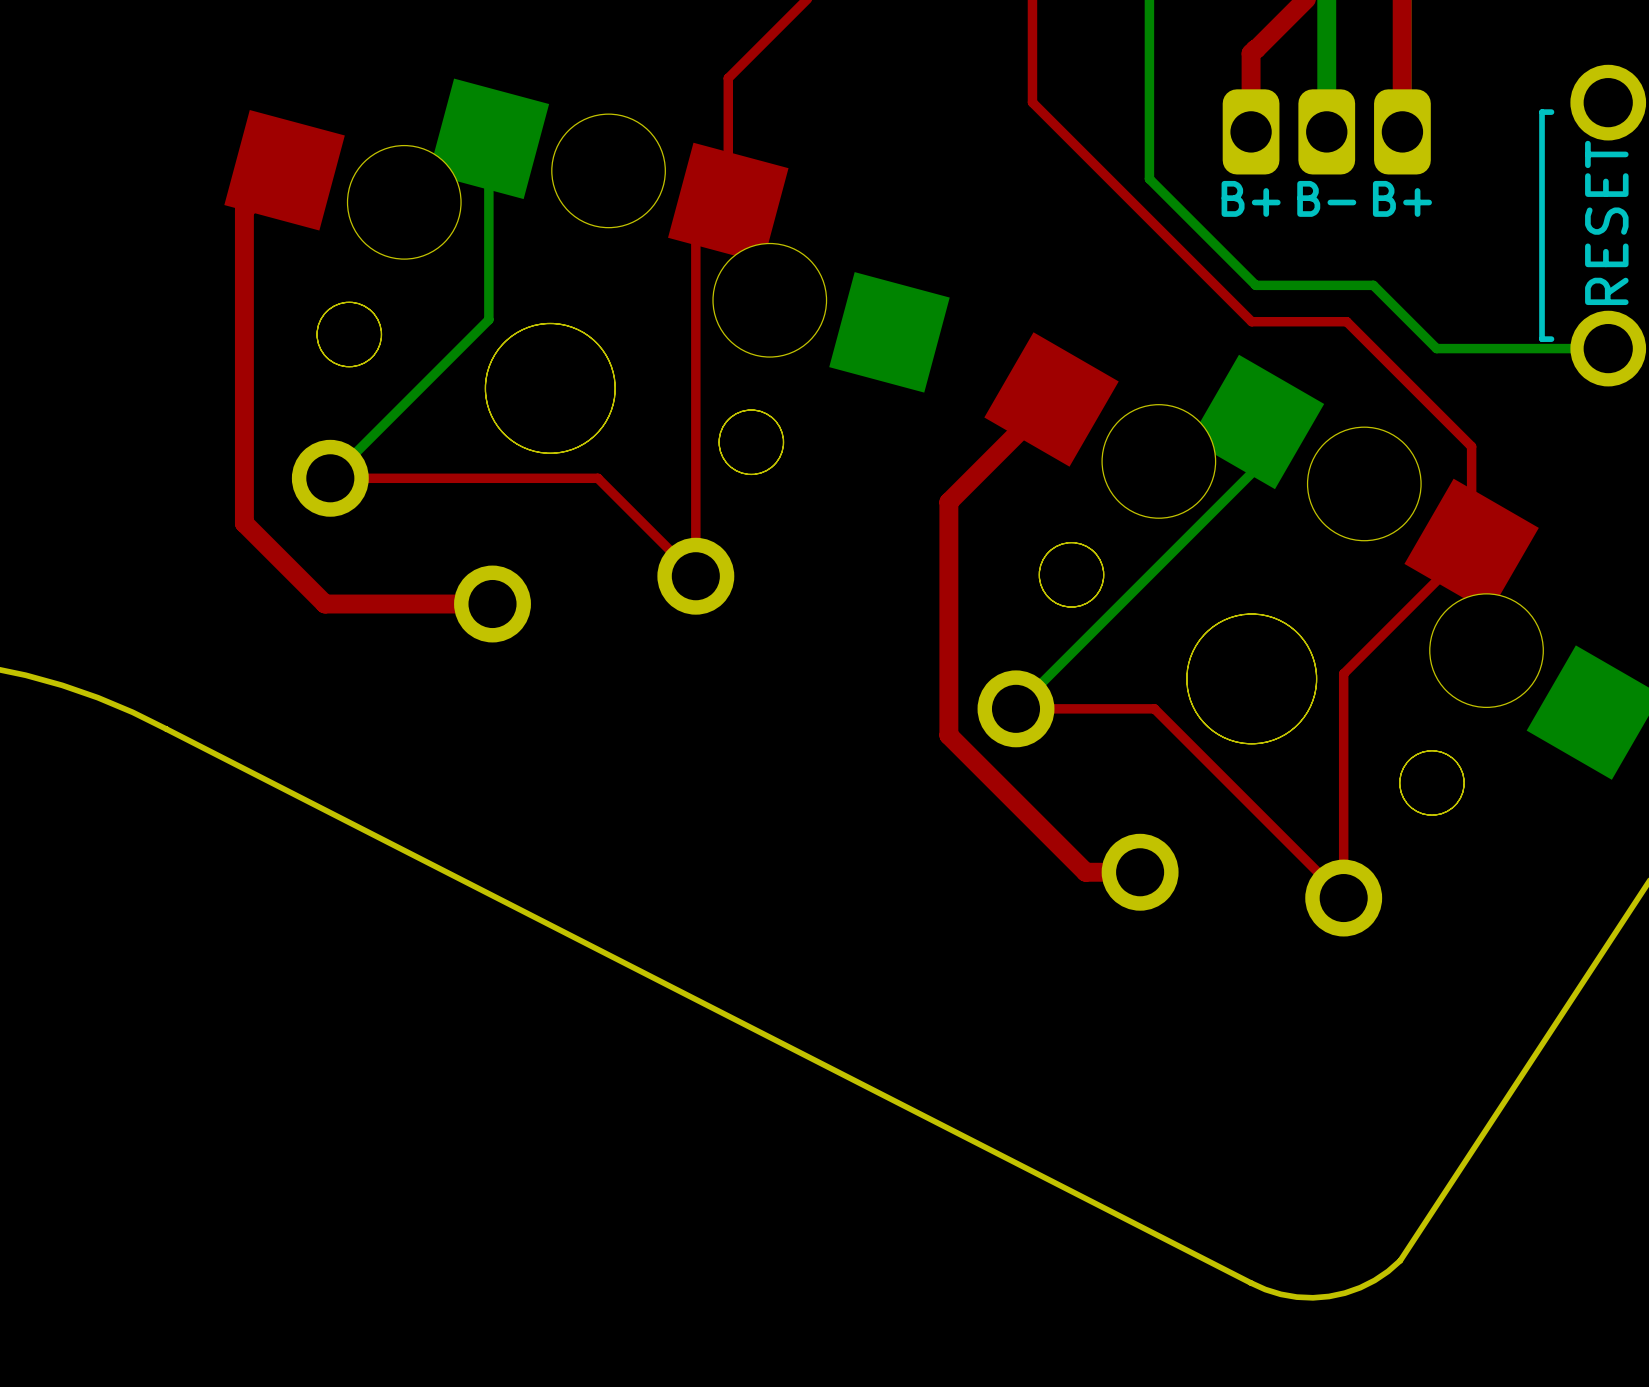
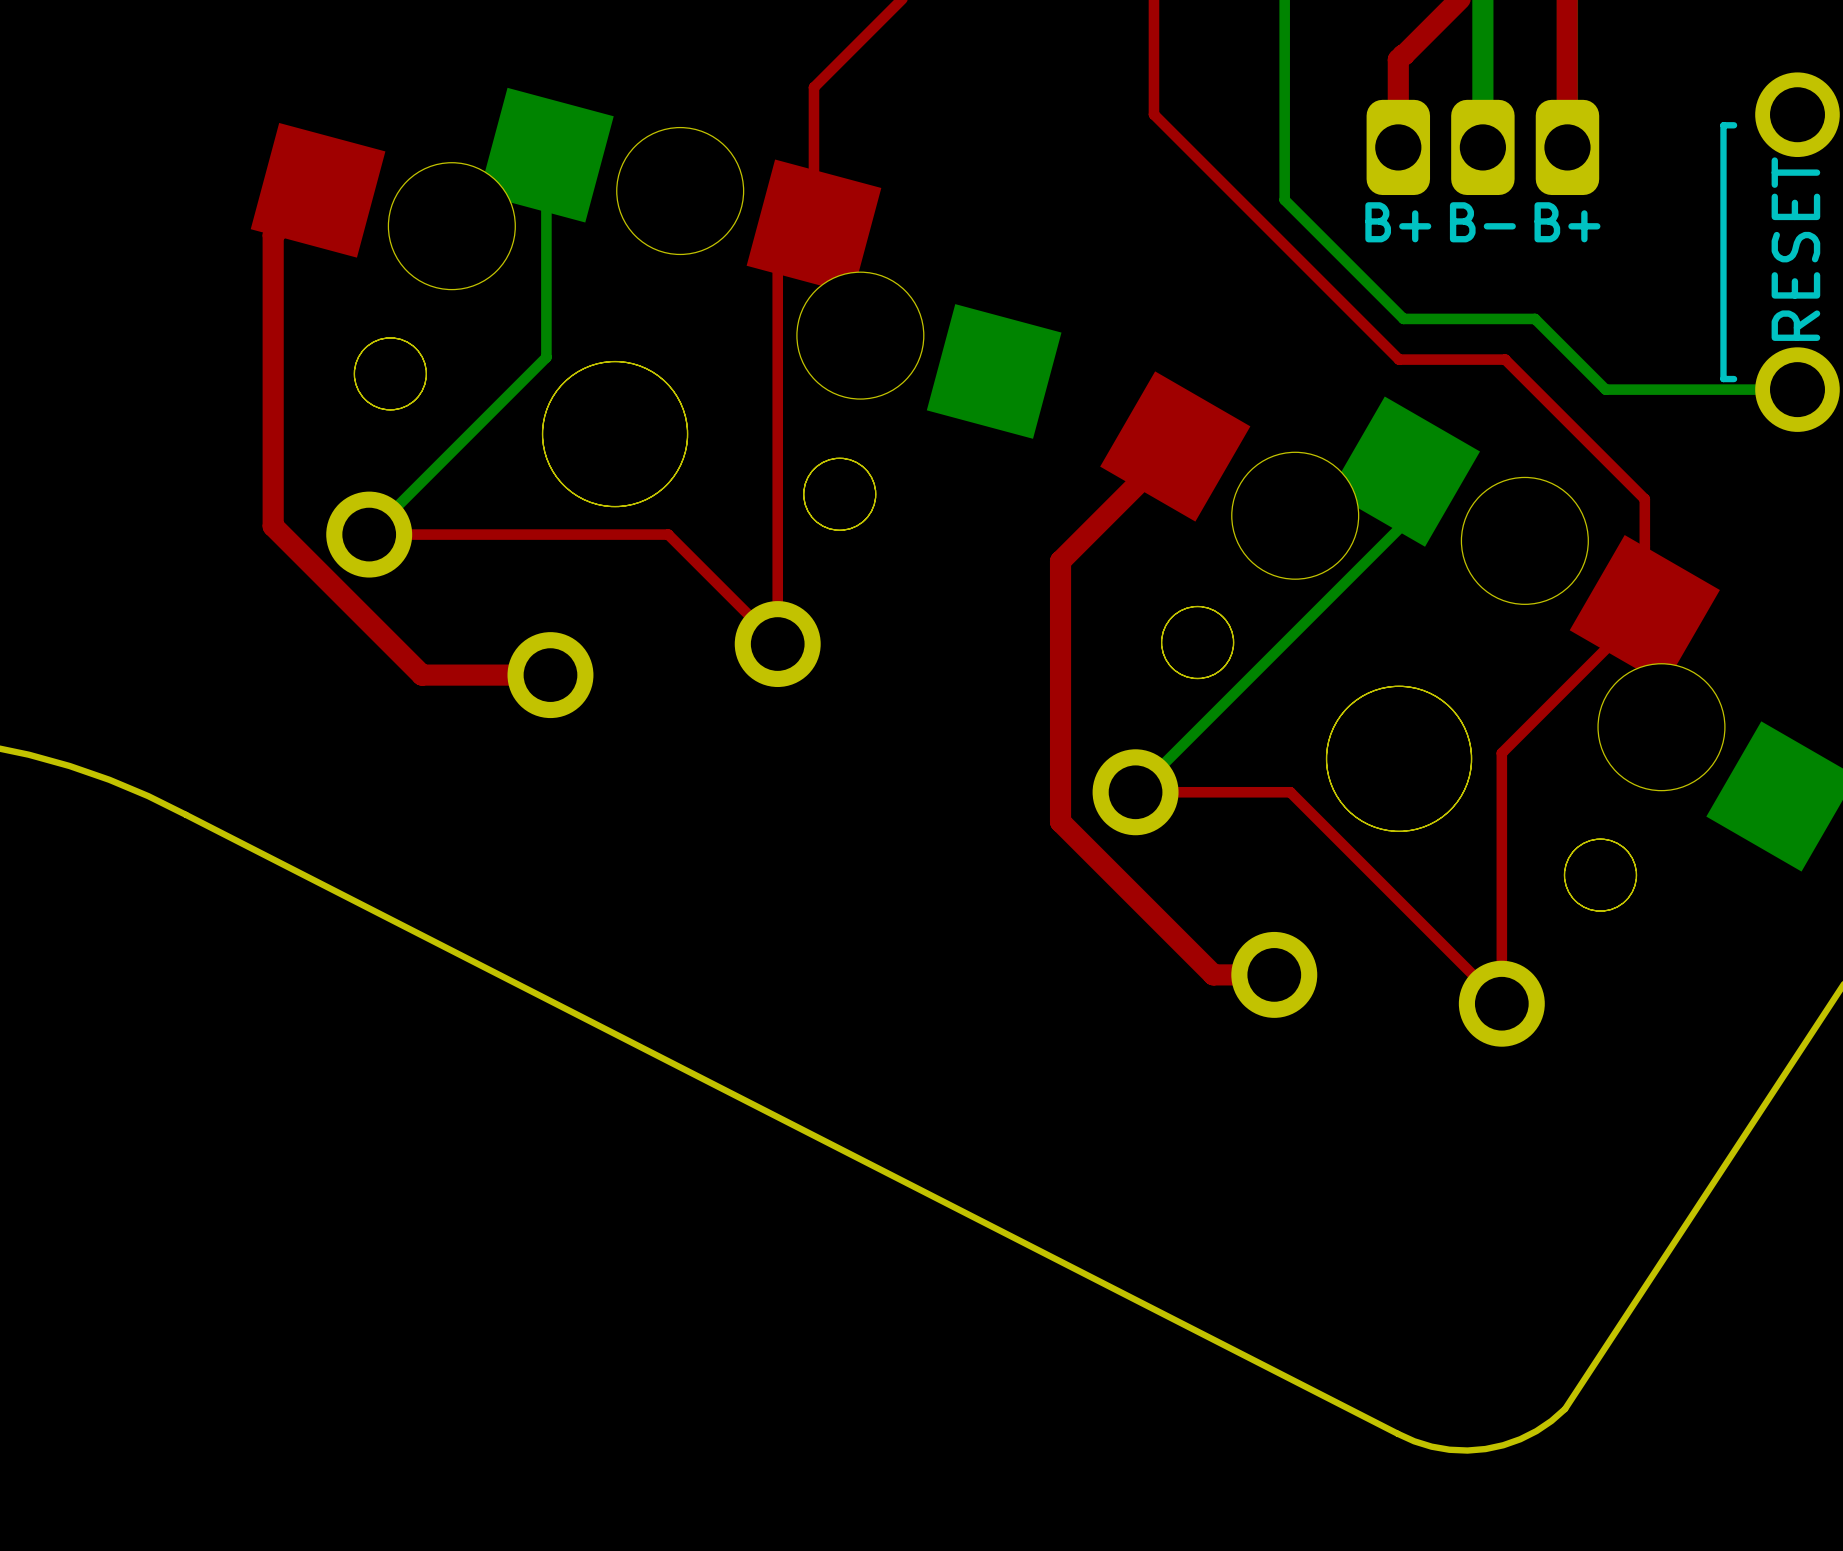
top track: (244, 470) (244, 523) (325, 604) (377, 604) -> (273, 526) (422, 675)

